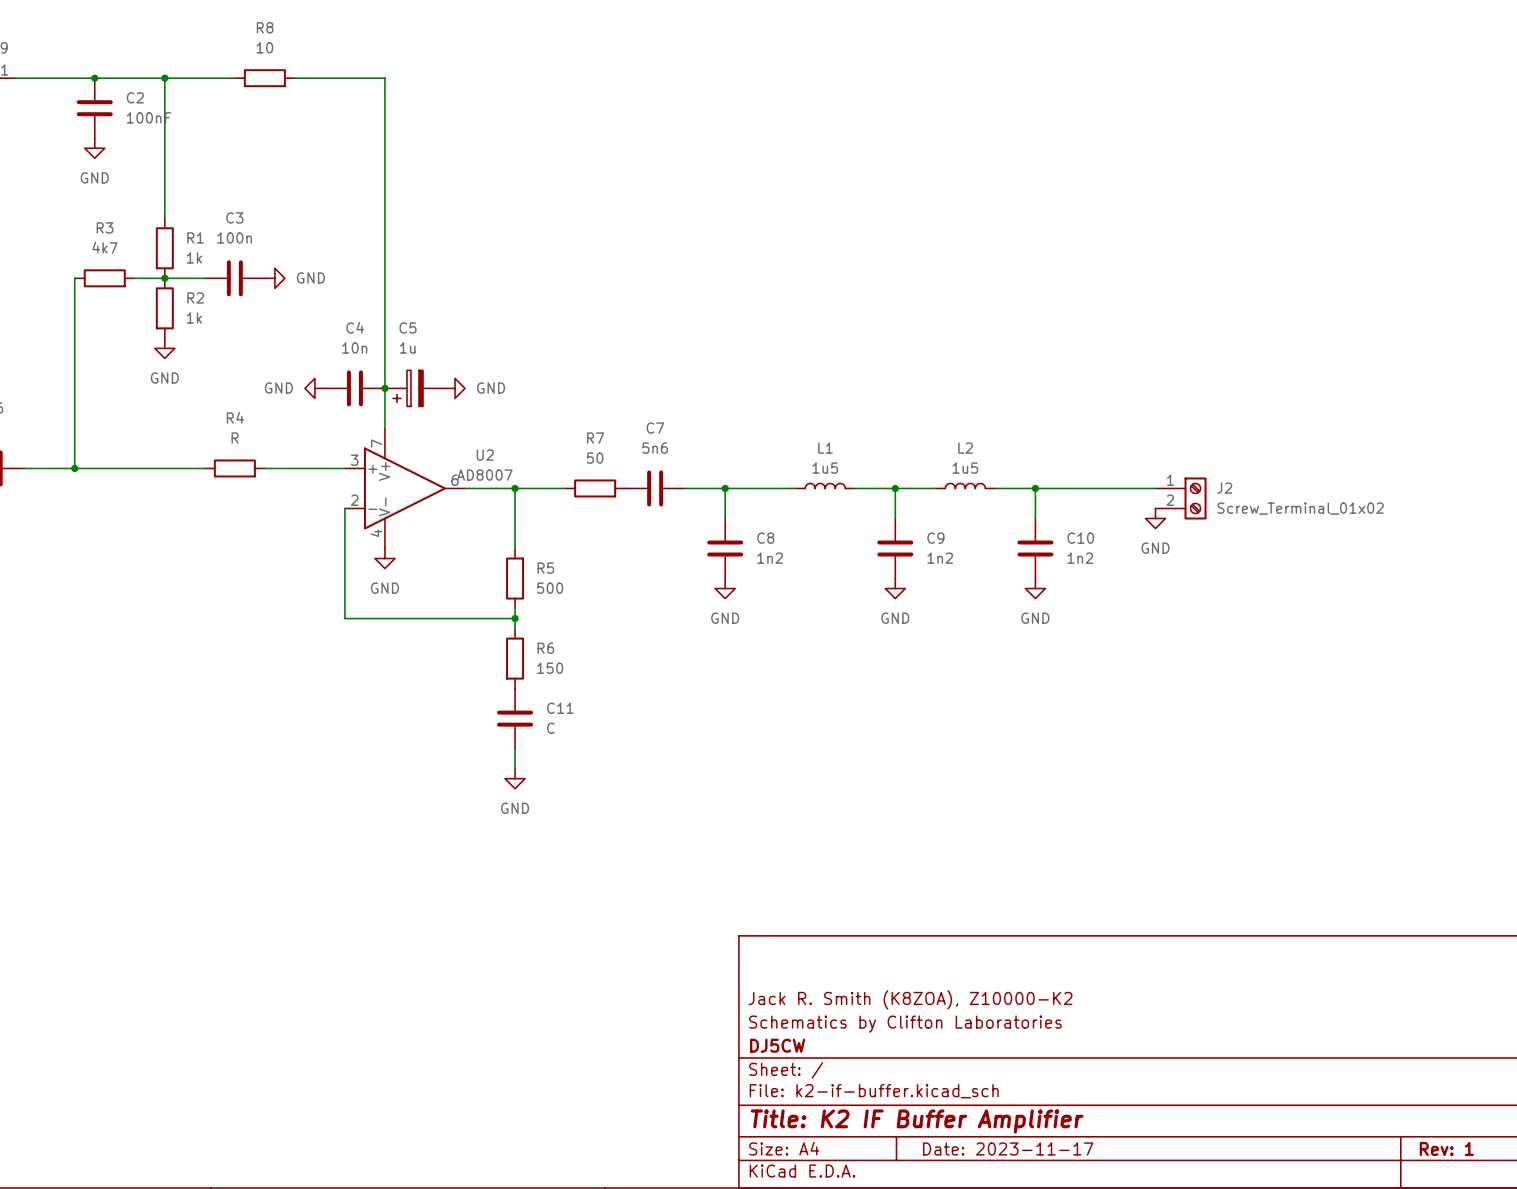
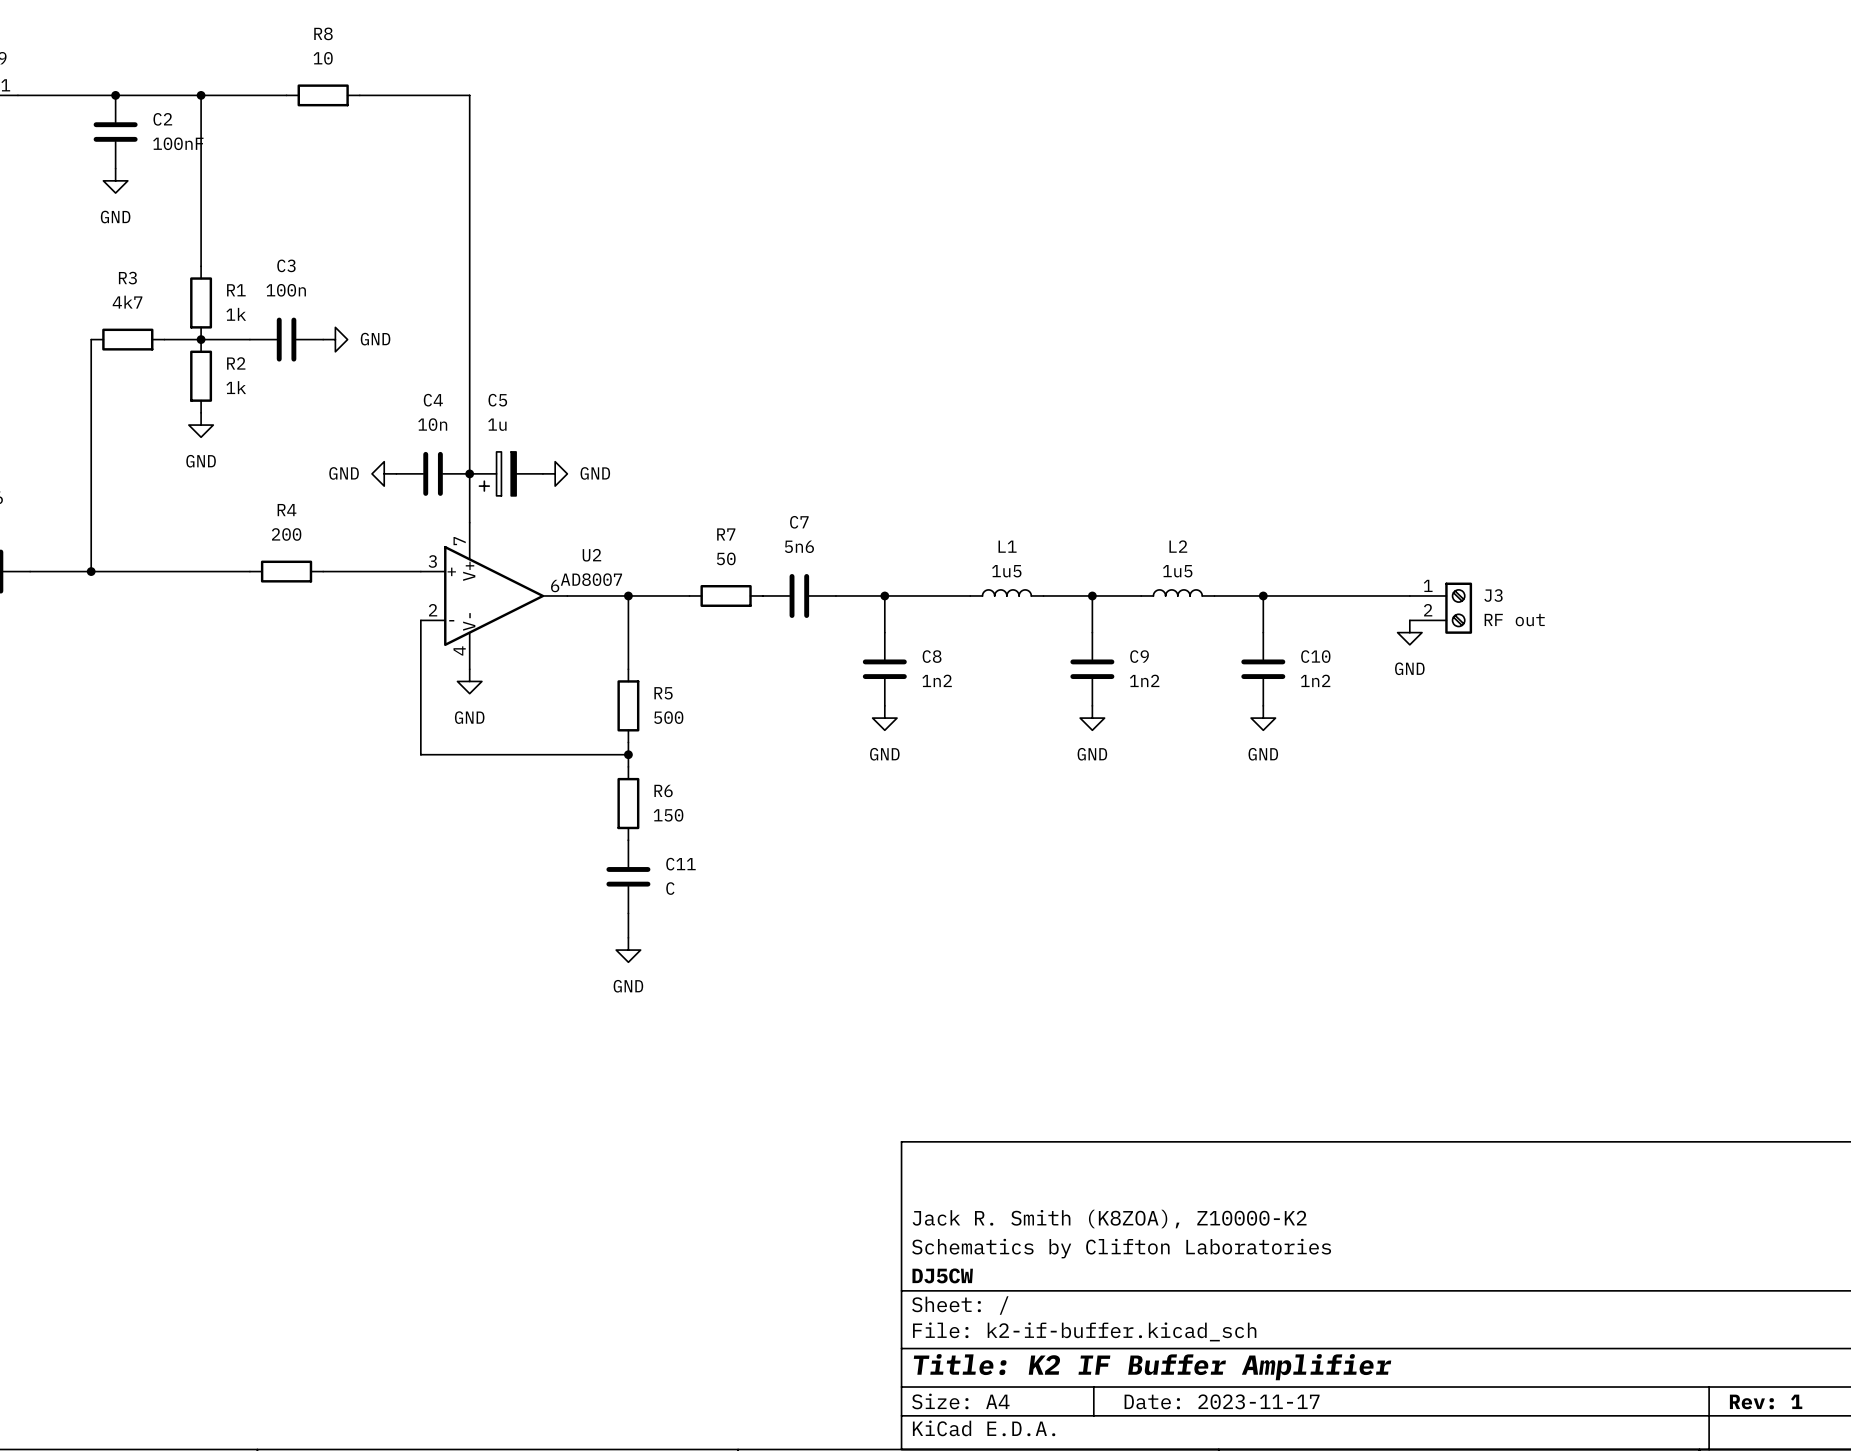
R4 value: R (235, 438) -> 200 (286, 534)
J2 name: J2 (1224, 488) -> J3 (1493, 595)
J2 value: Screw_Terminal_01x02 (1300, 508) -> RF out (1514, 620)

